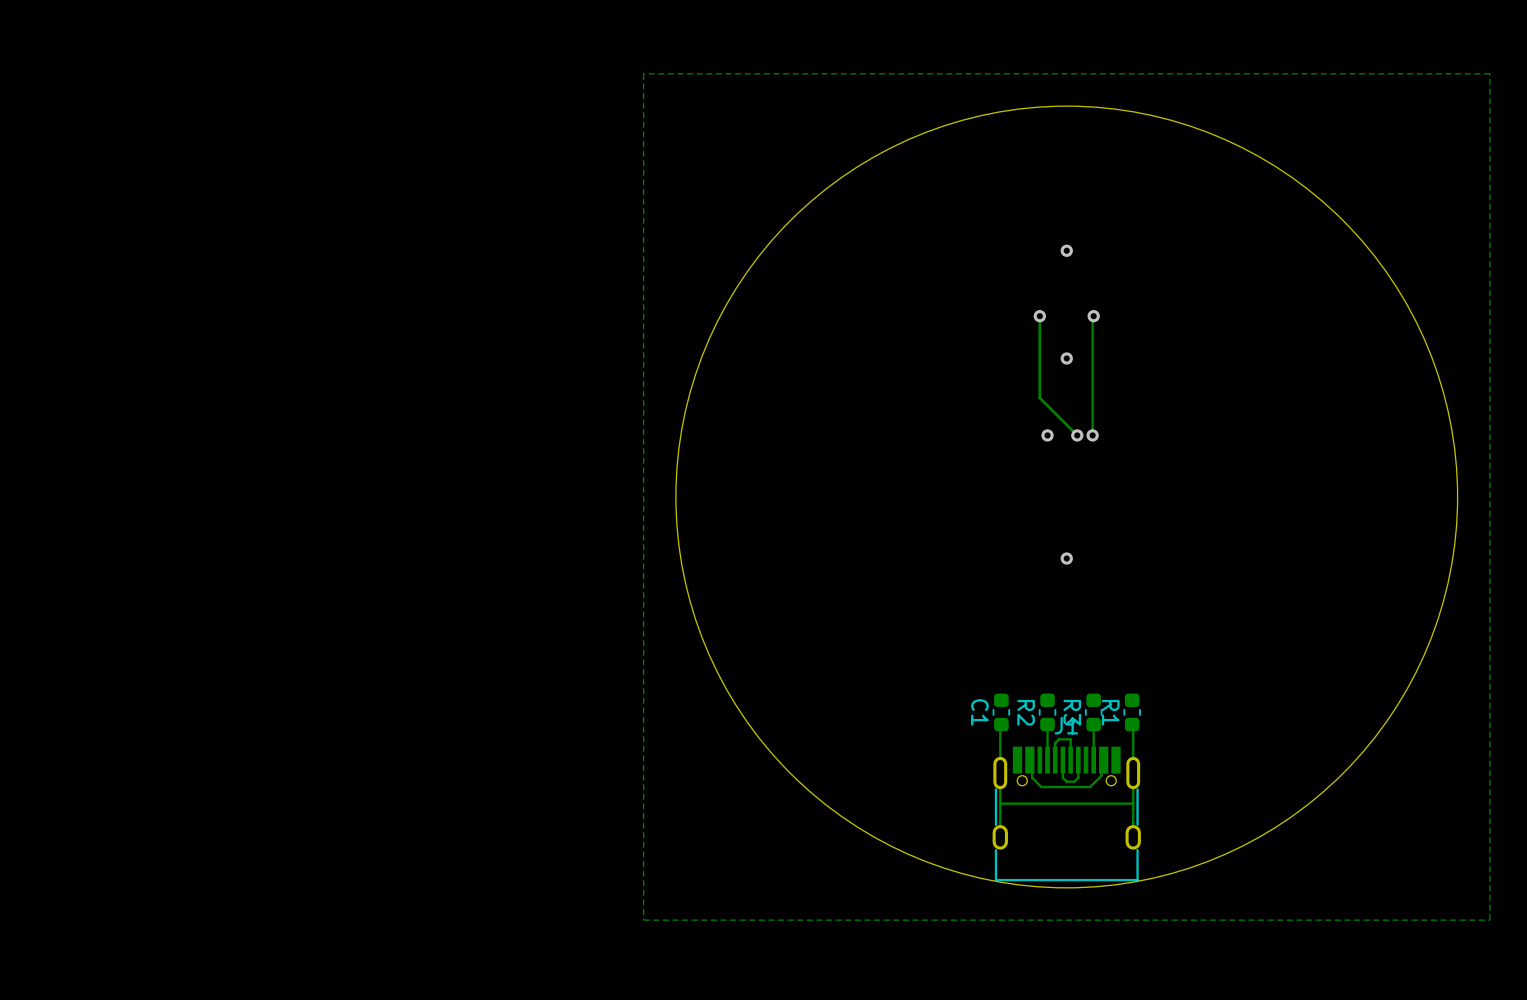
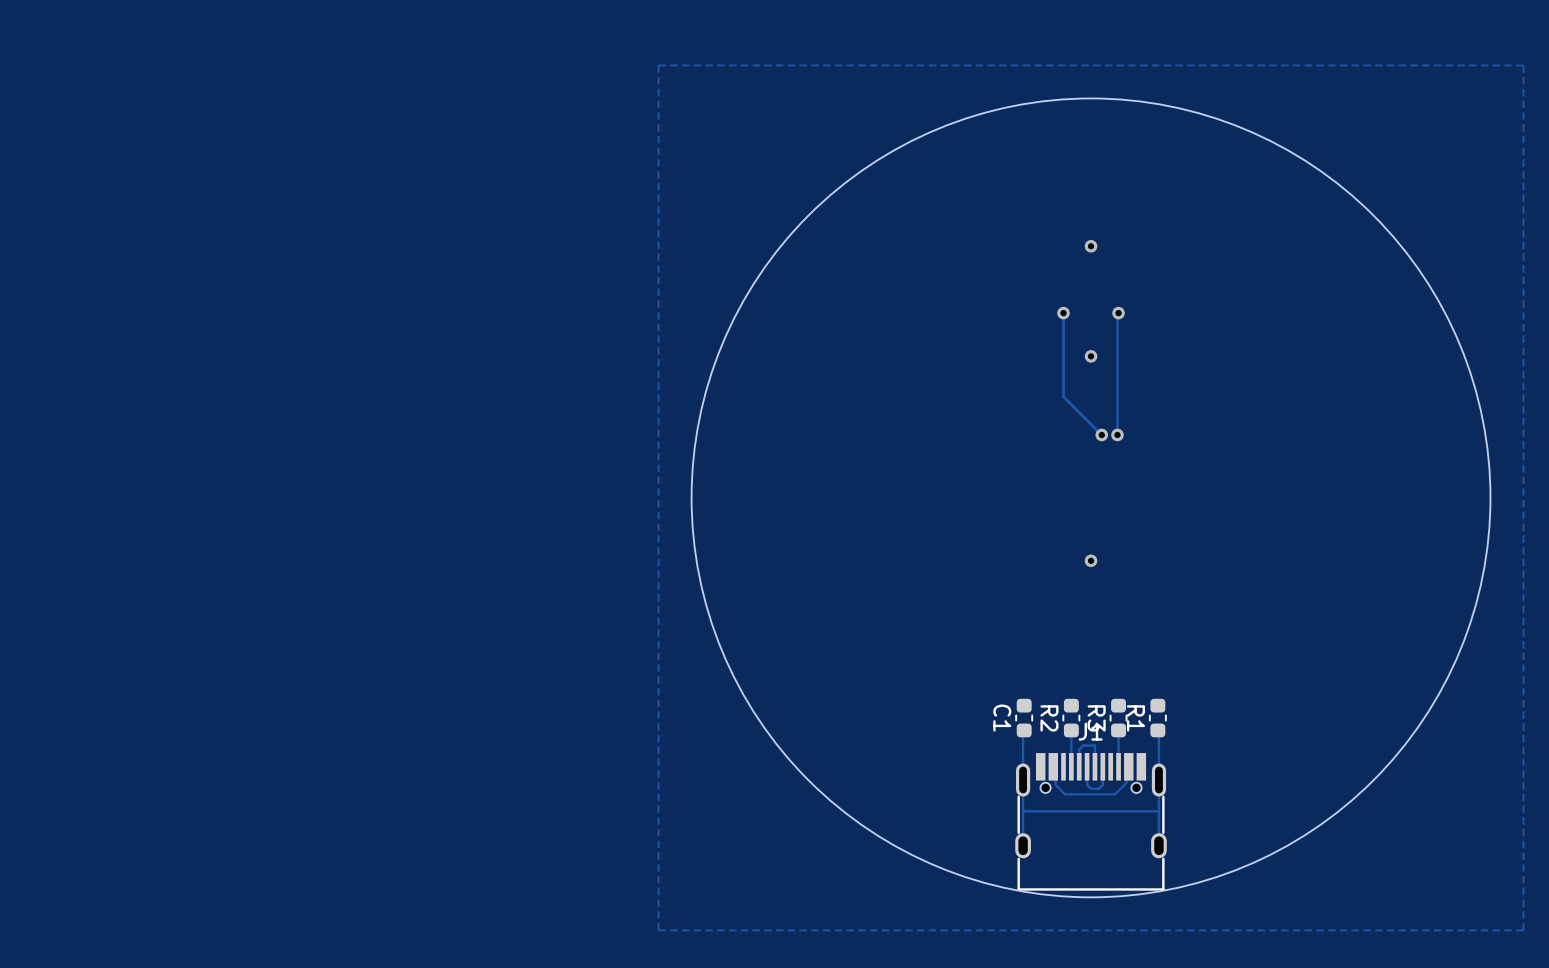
via: (1047, 435) -> none

